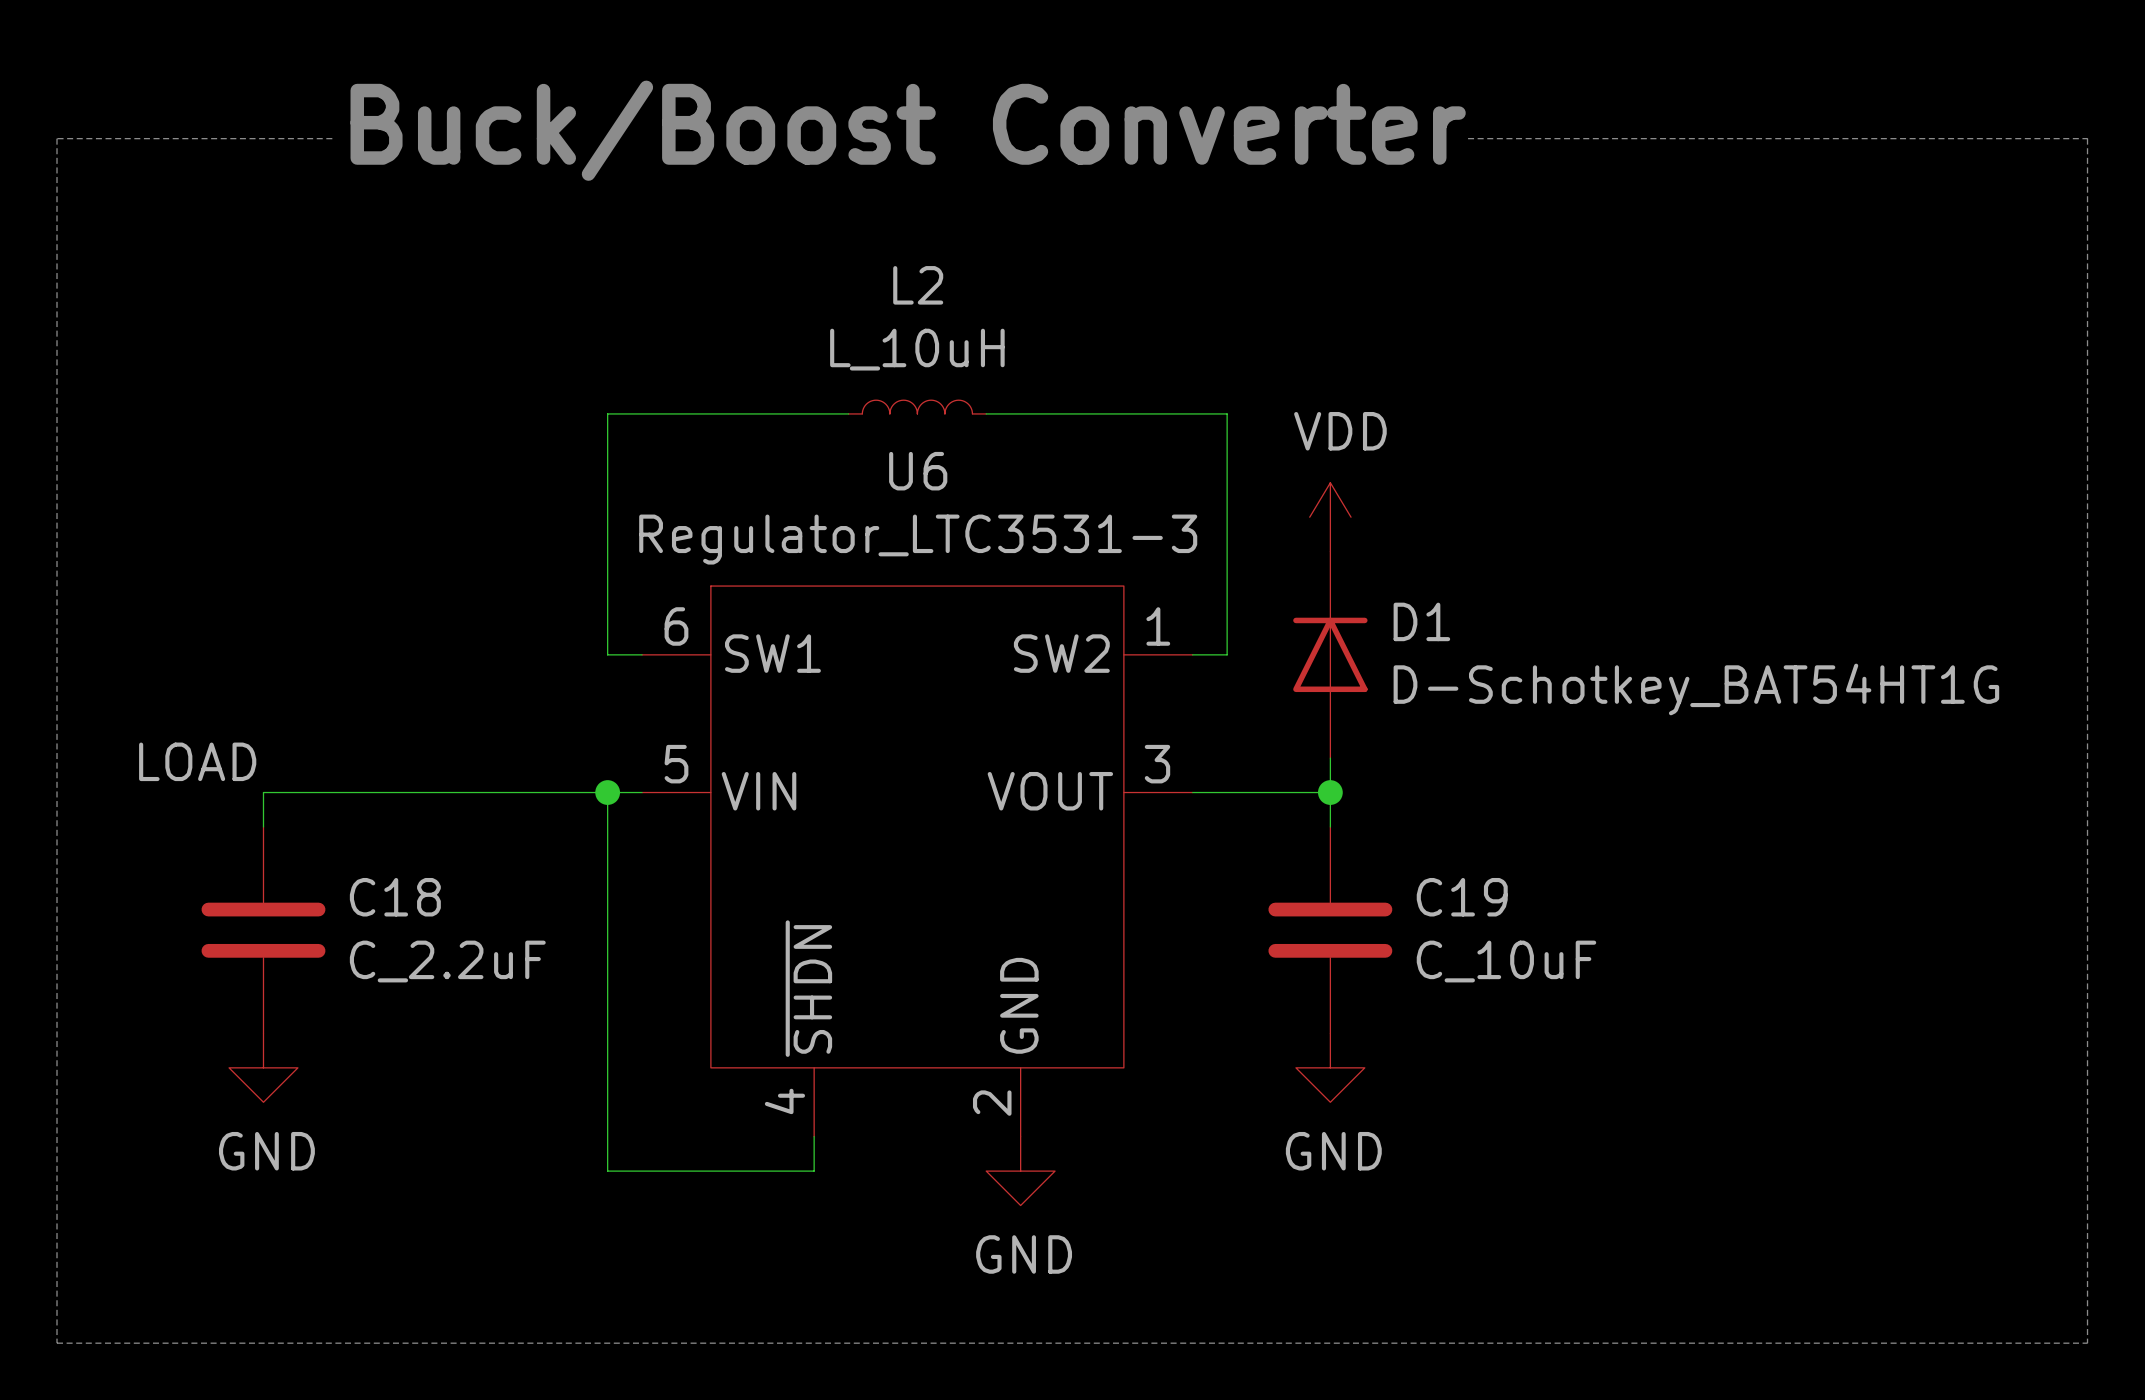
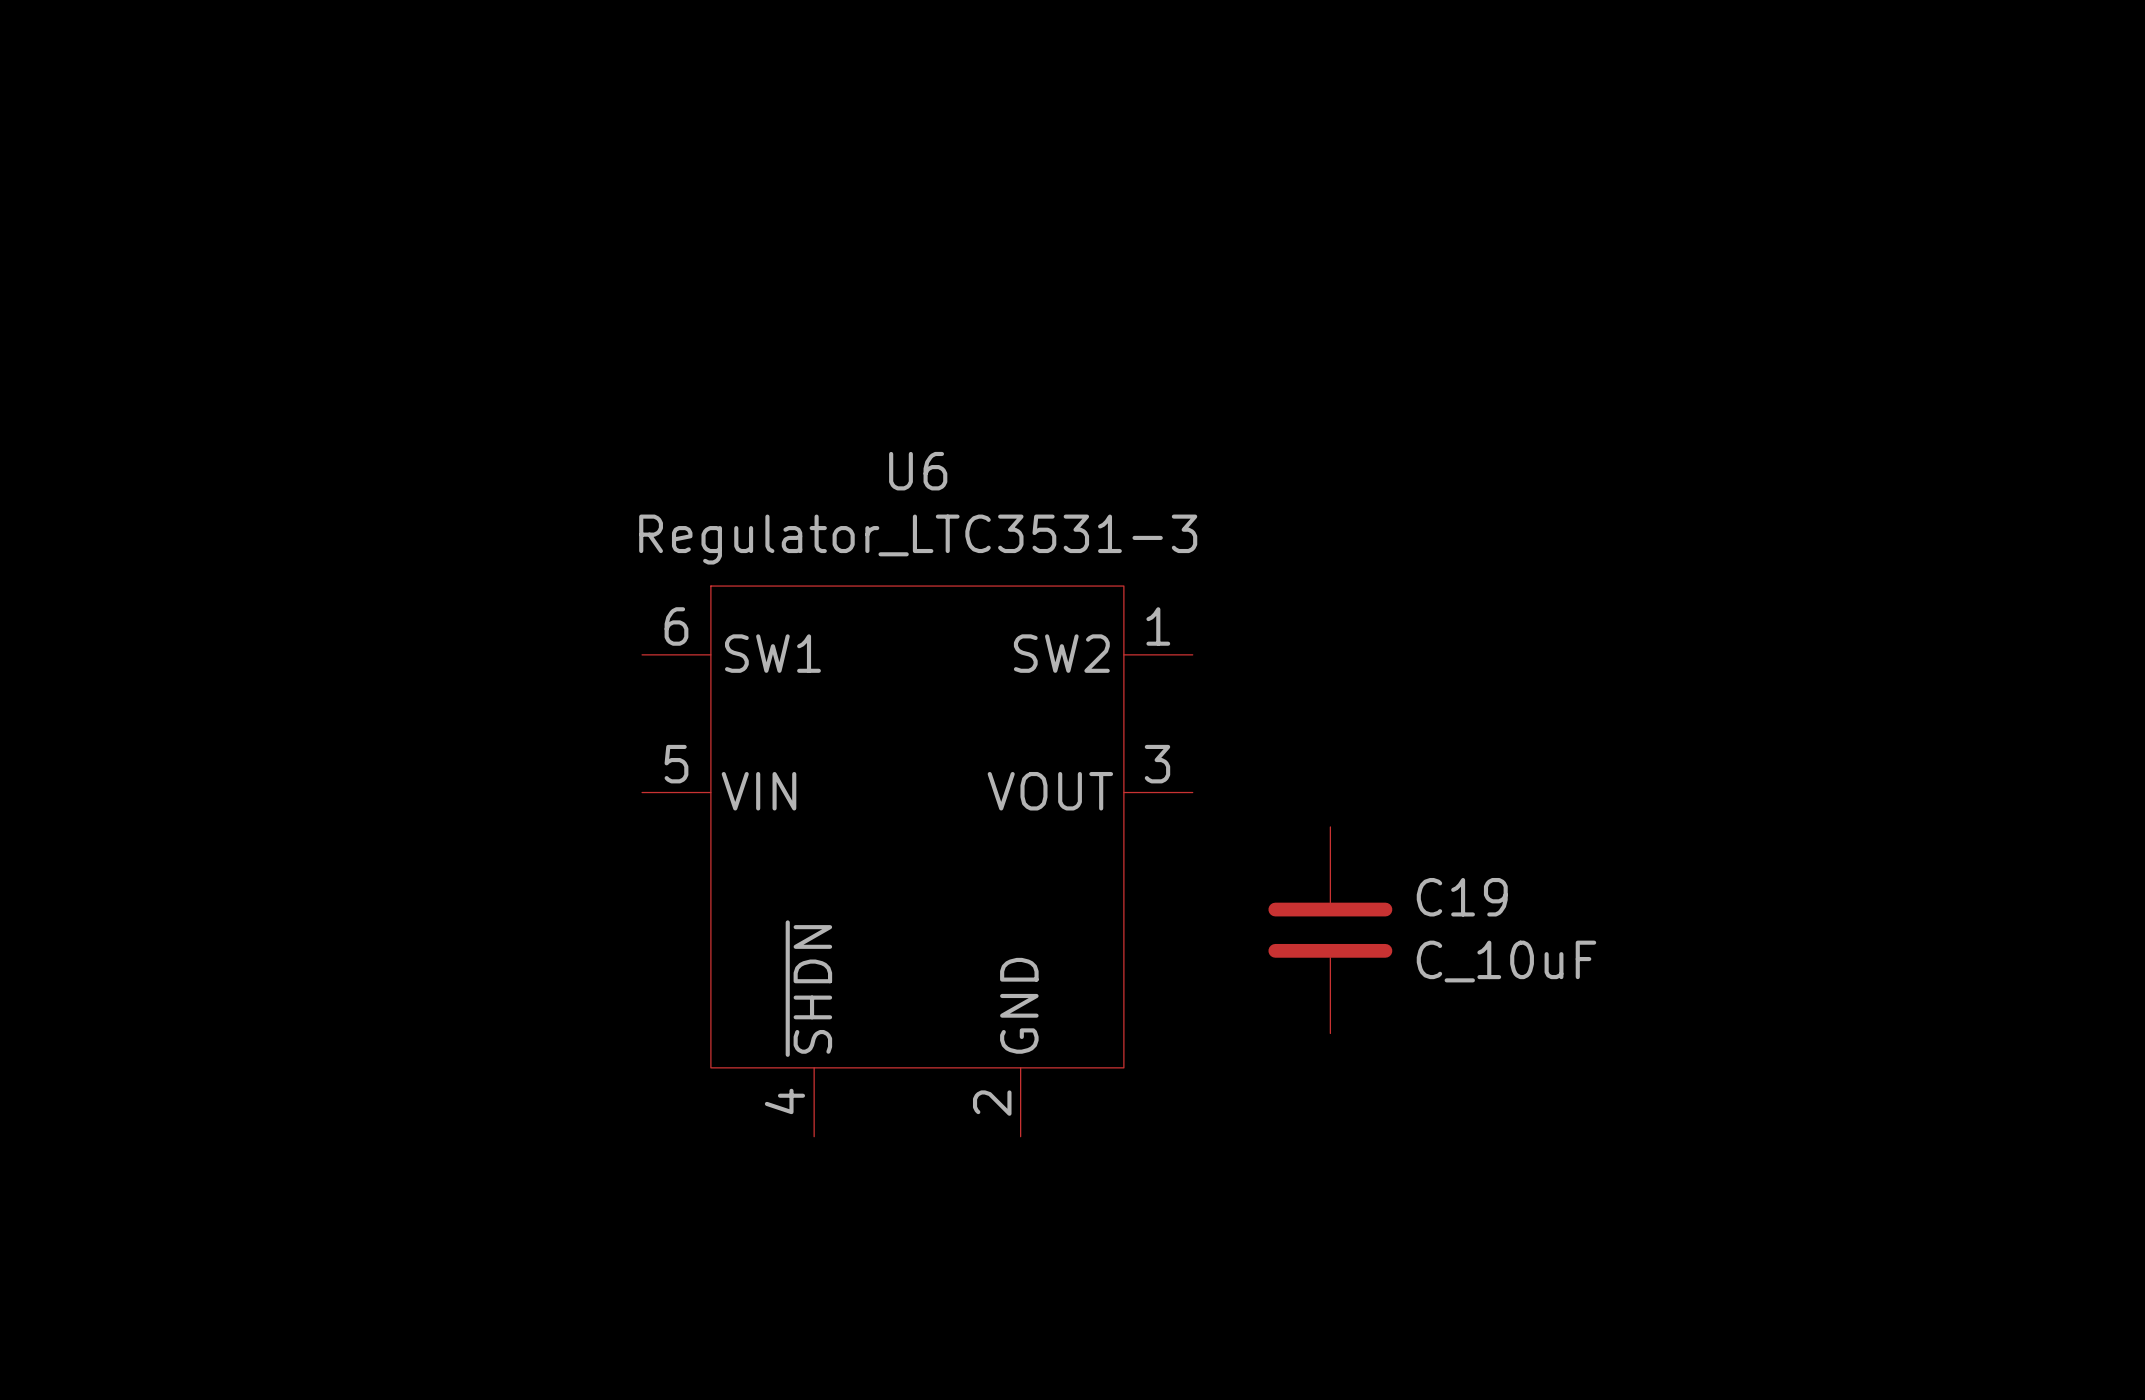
text: Buck/Boost Converter (908, 130) -> none
line: (332, 138) (57, 138) (57, 1343) (2087, 1343) (2087, 138) (1468, 138) -> none
L2: L_10uH (917, 407) -> none
wire: (848, 413) (607, 413) (607, 654) (642, 654) -> none
wire: (986, 413) (1227, 413) (1227, 654) (1192, 654) -> none
power symbol: VDD (1330, 517) -> none
D1: D-Schotkey_BAT54HT1G (1330, 654) -> none
wire: (1330, 758) (1330, 826) -> none
label: LOAD (197, 761) -> none
wire: (607, 792) (607, 1171) (814, 1171) (814, 1136) -> none
junction: (607, 792) -> none
wire: (642, 792) (263, 792) (263, 826) -> none
wire: (1192, 792) (1330, 792) -> none
junction: (1330, 792) -> none
C18: C_2.2uF (263, 930) -> none
power symbol: GND (263, 1067) -> none
power symbol: GND (1330, 1067) -> none
power symbol: GND (1020, 1171) -> none

